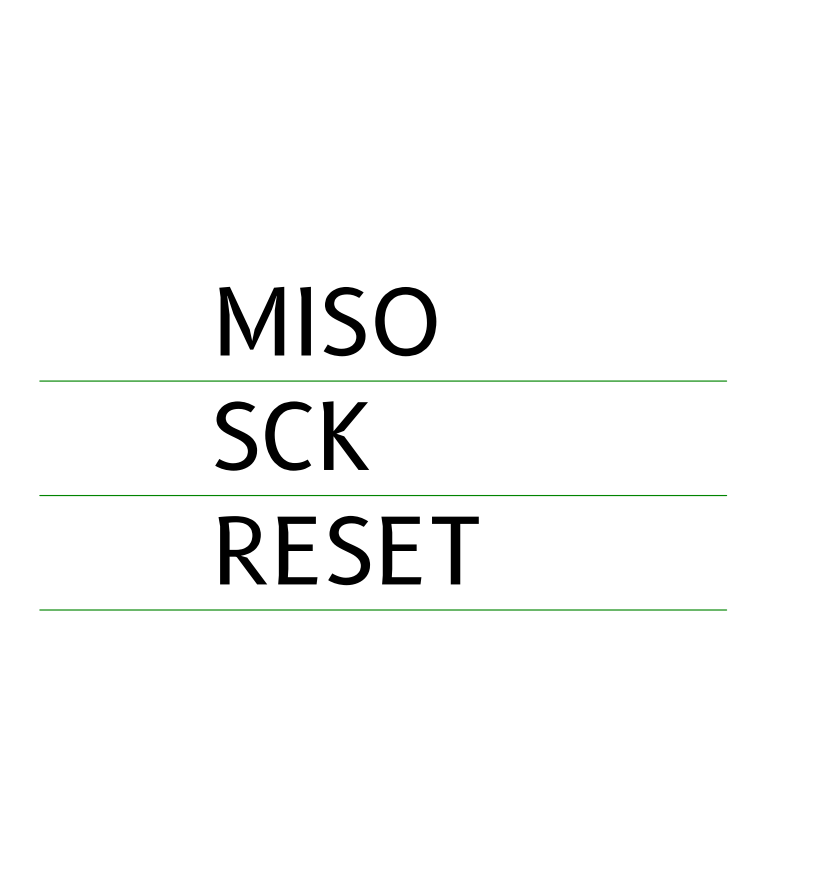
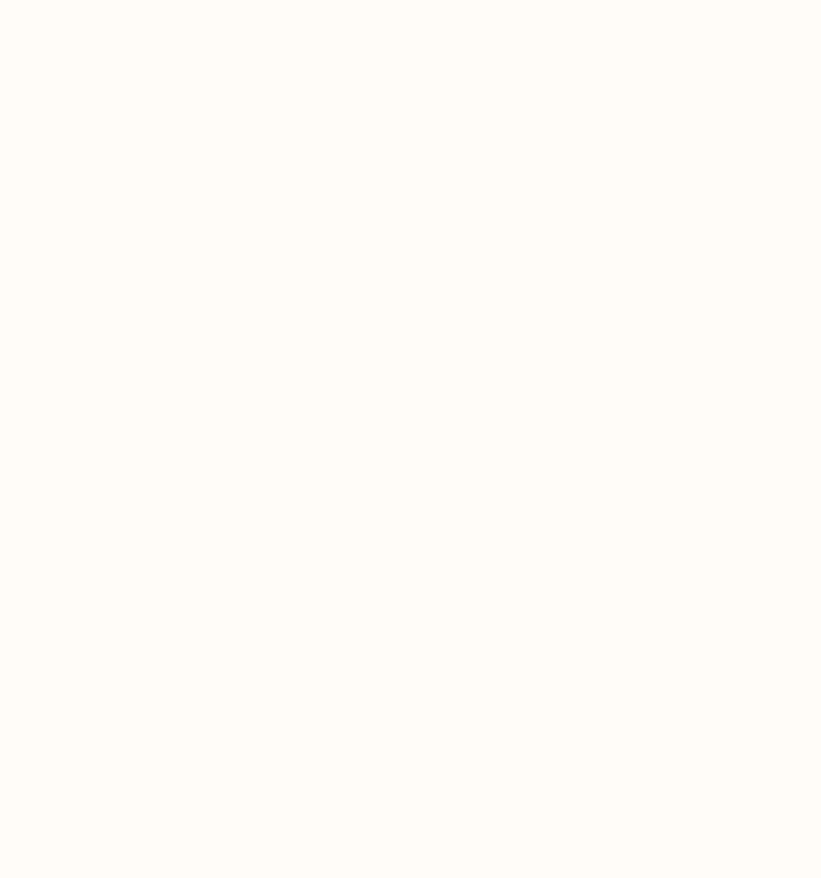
label: MISO (327, 321) -> none
wire: (39, 381) (726, 381) -> none
label: SCK (292, 436) -> none
wire: (39, 495) (726, 495) -> none
label: RESET (348, 550) -> none
wire: (39, 610) (726, 610) -> none

